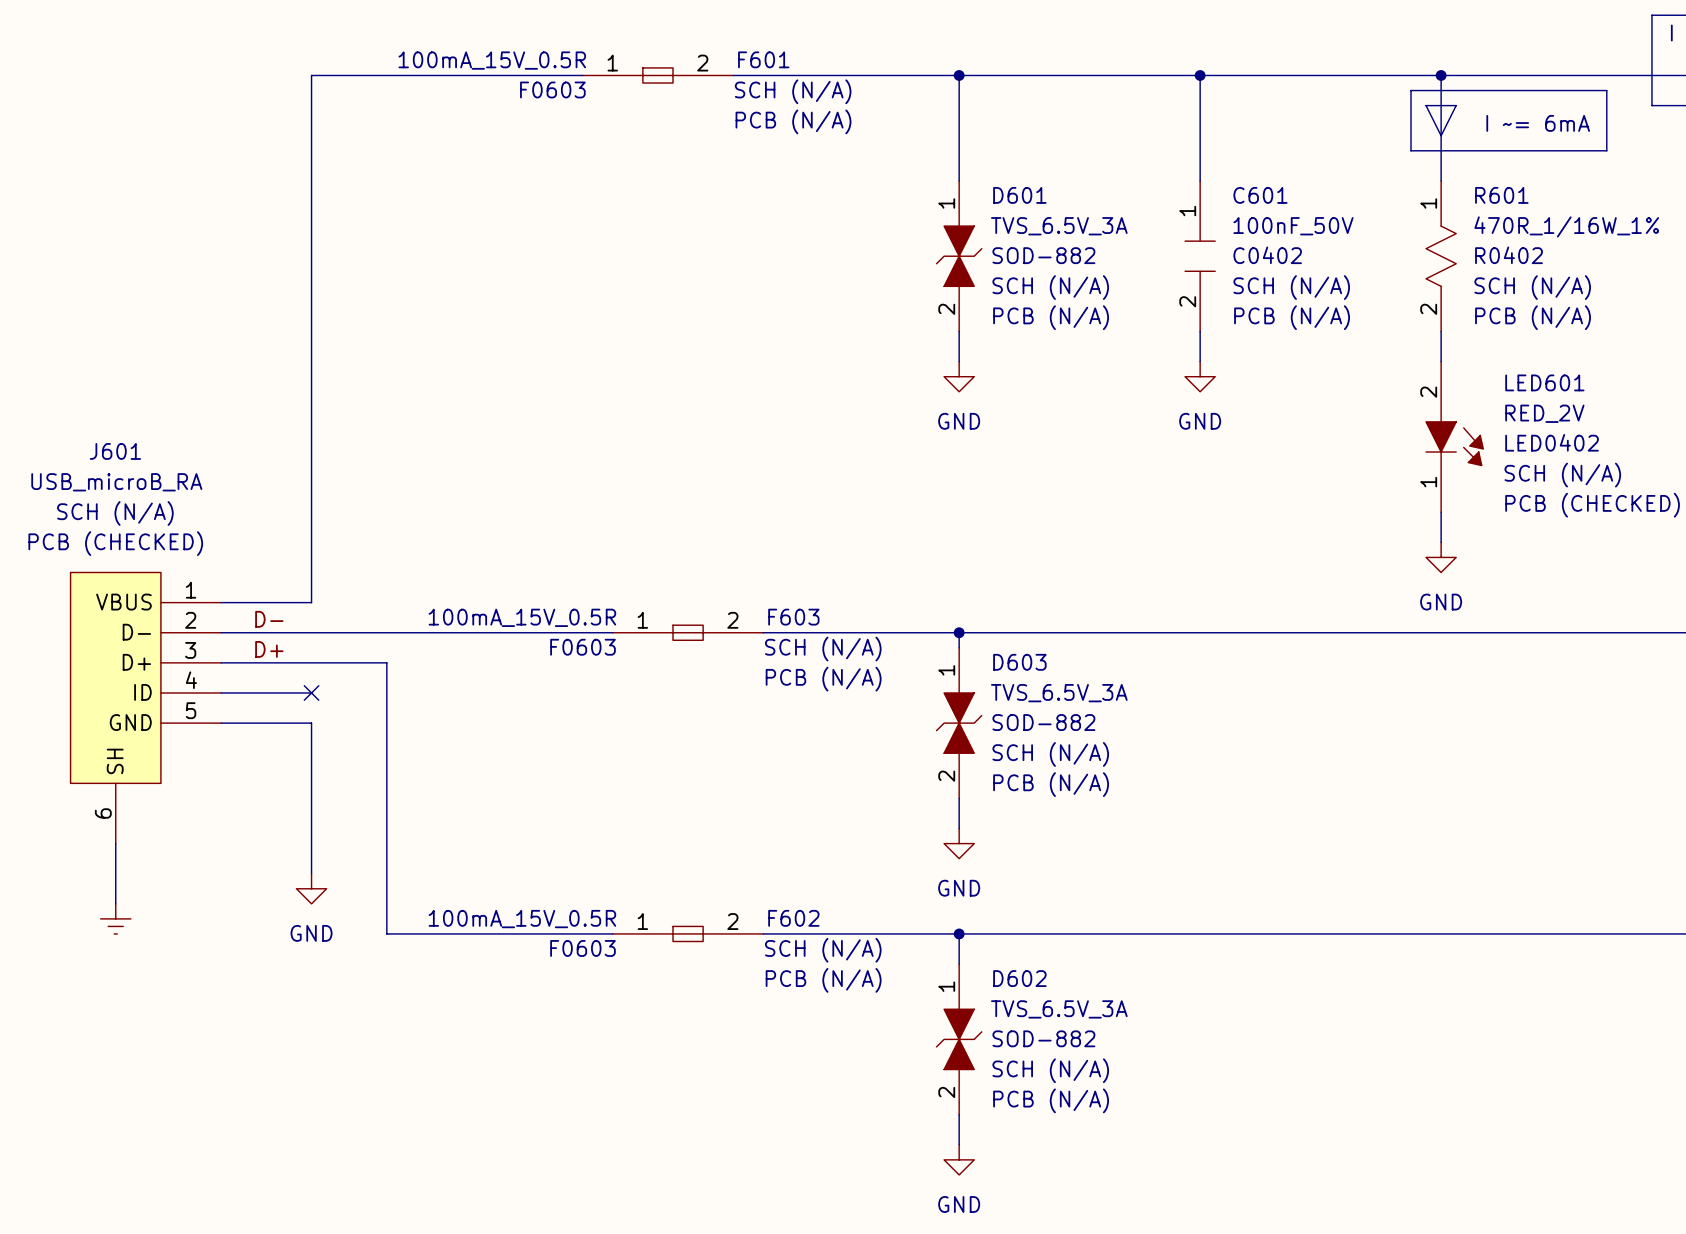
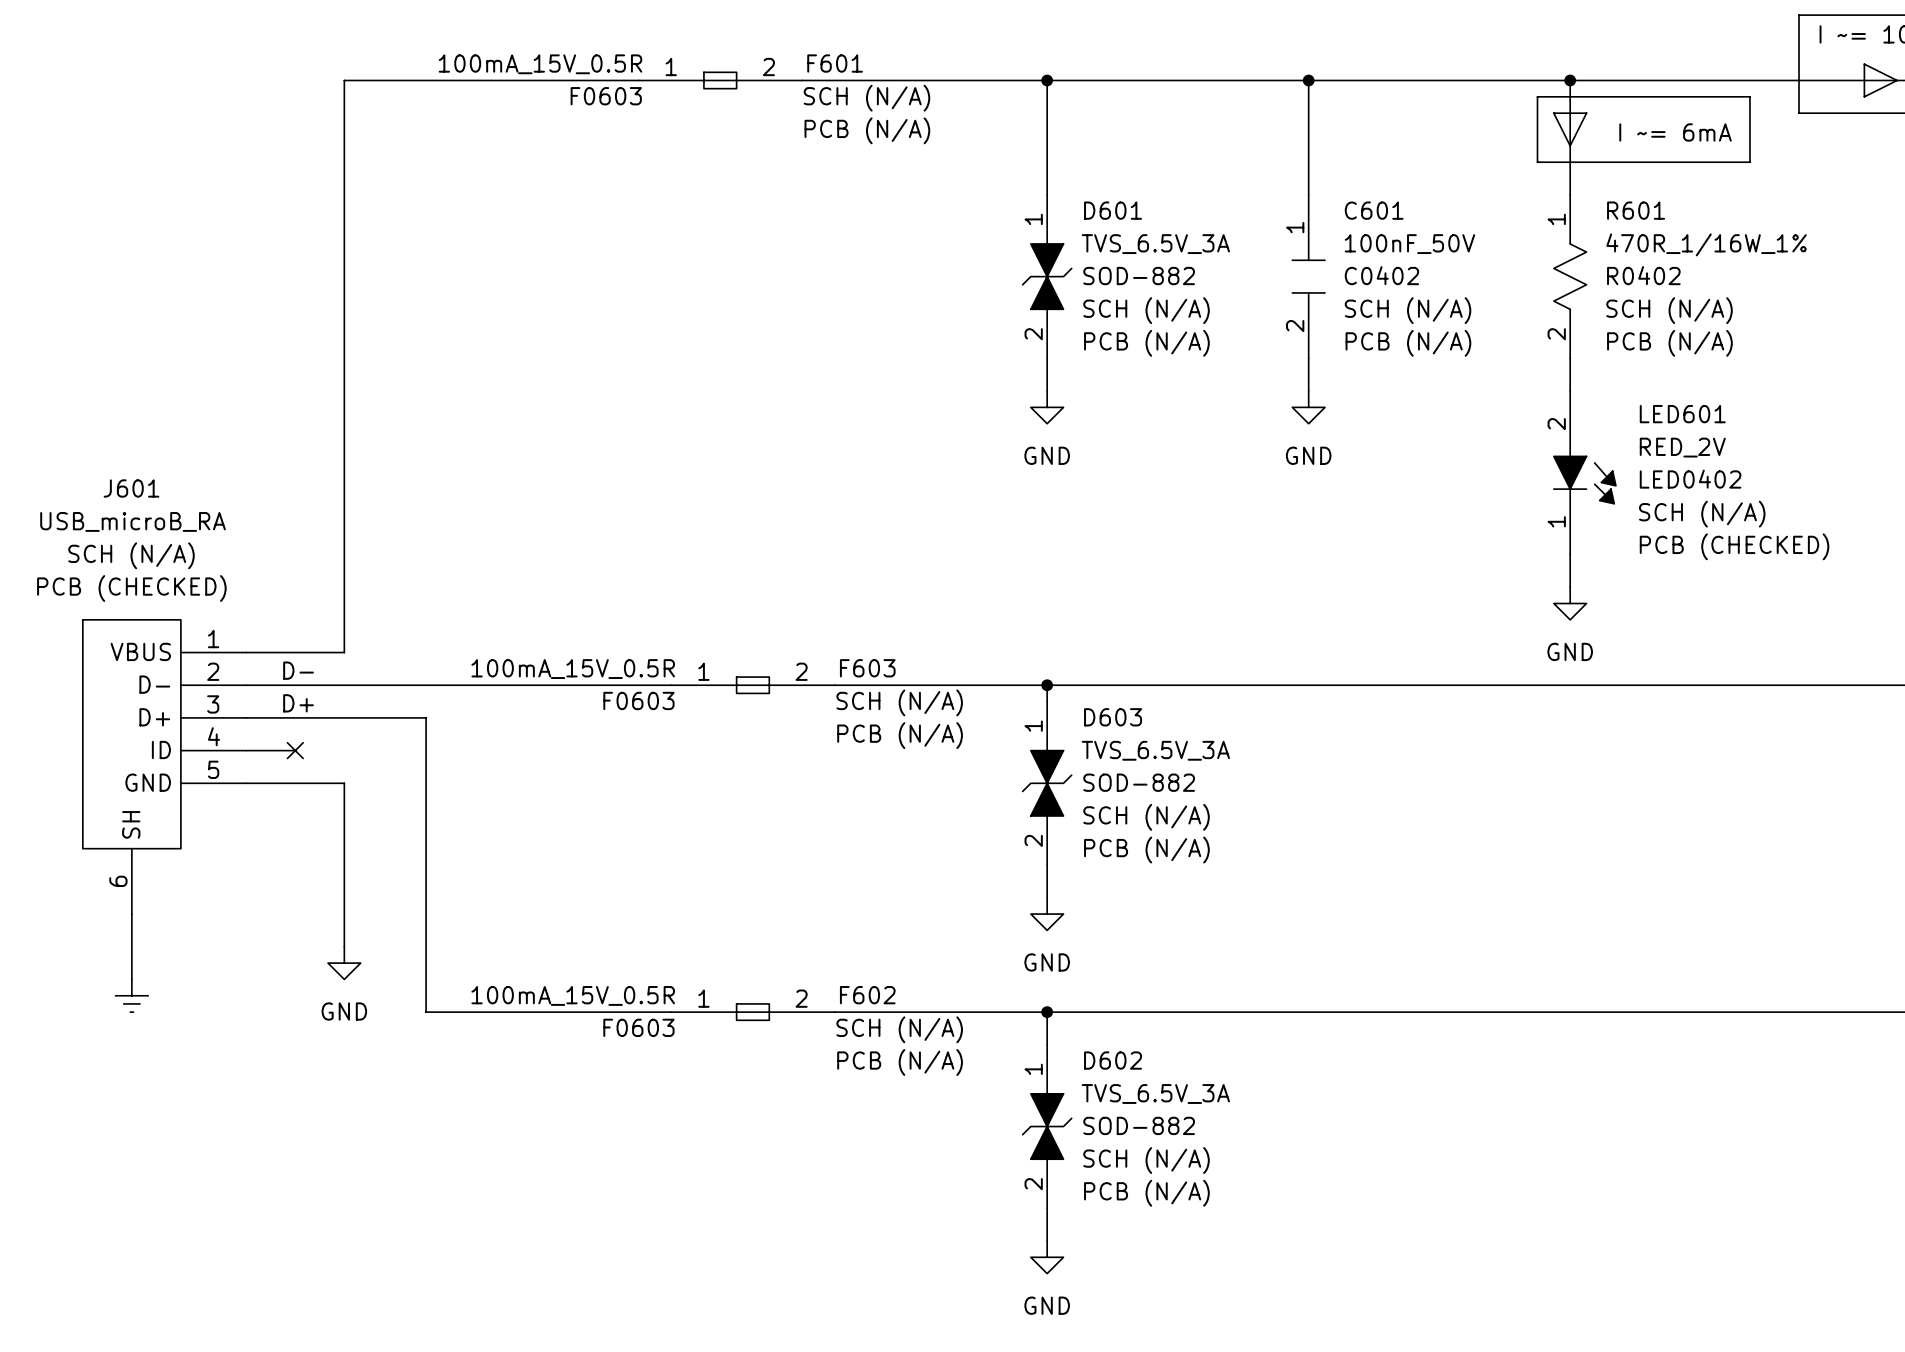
wire: (266, 692) (311, 692) -> none
no-connect mark position: (311, 692) -> (295, 750)

